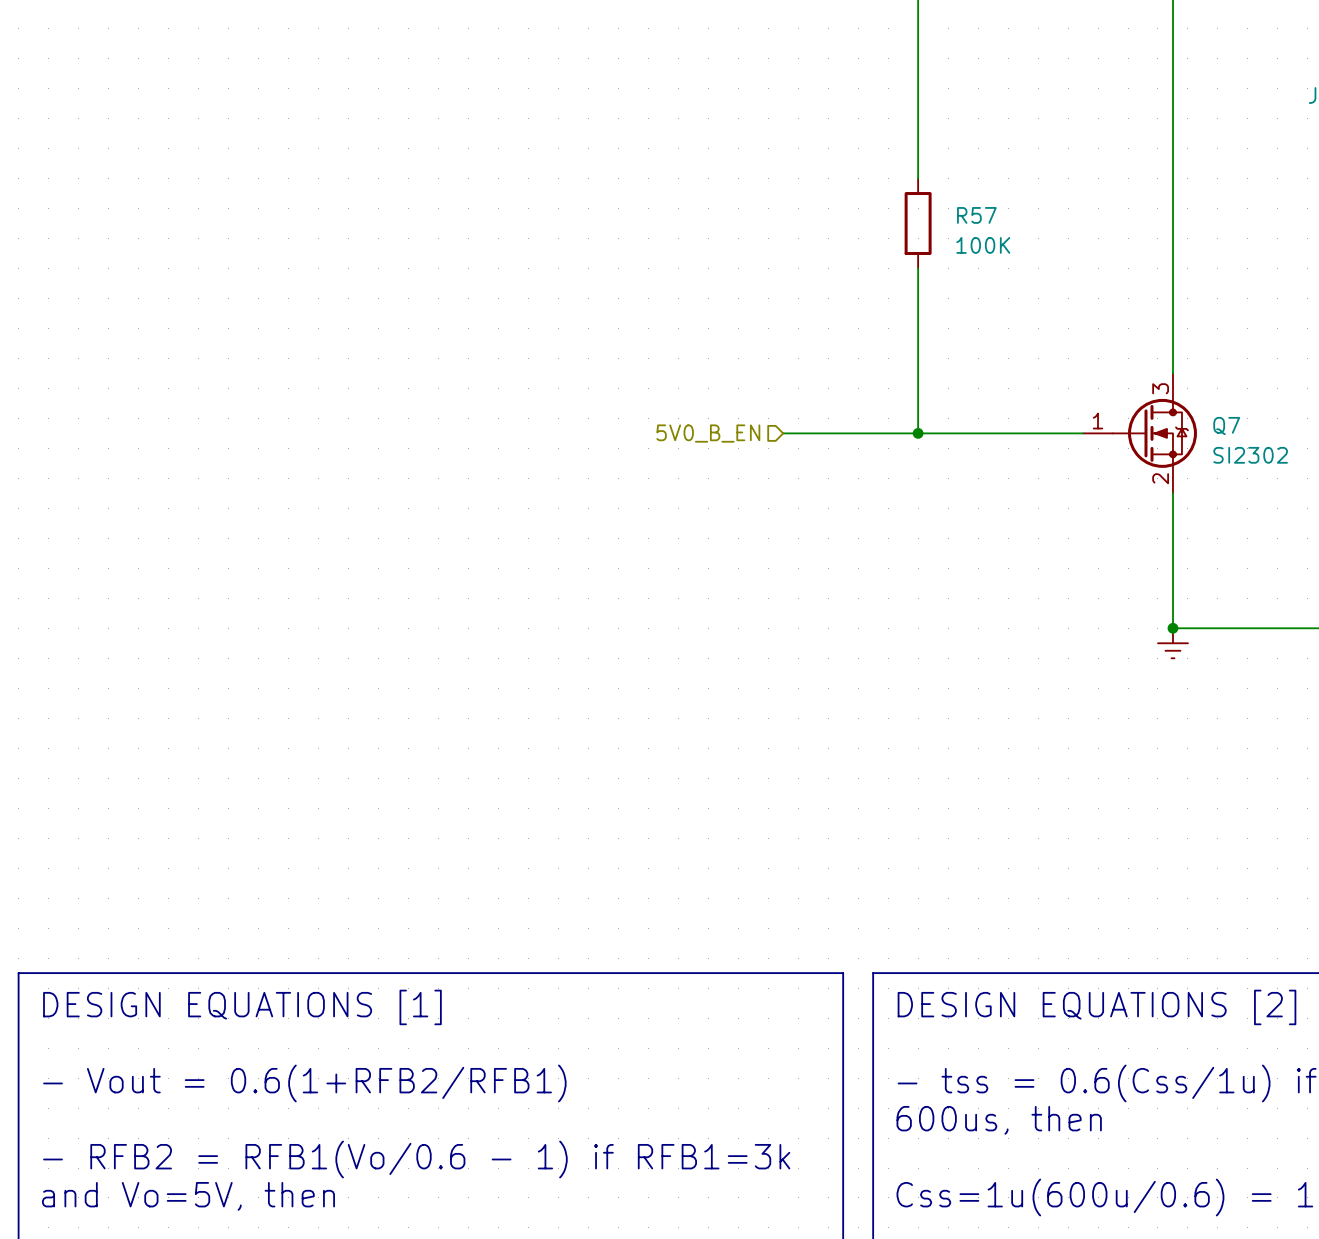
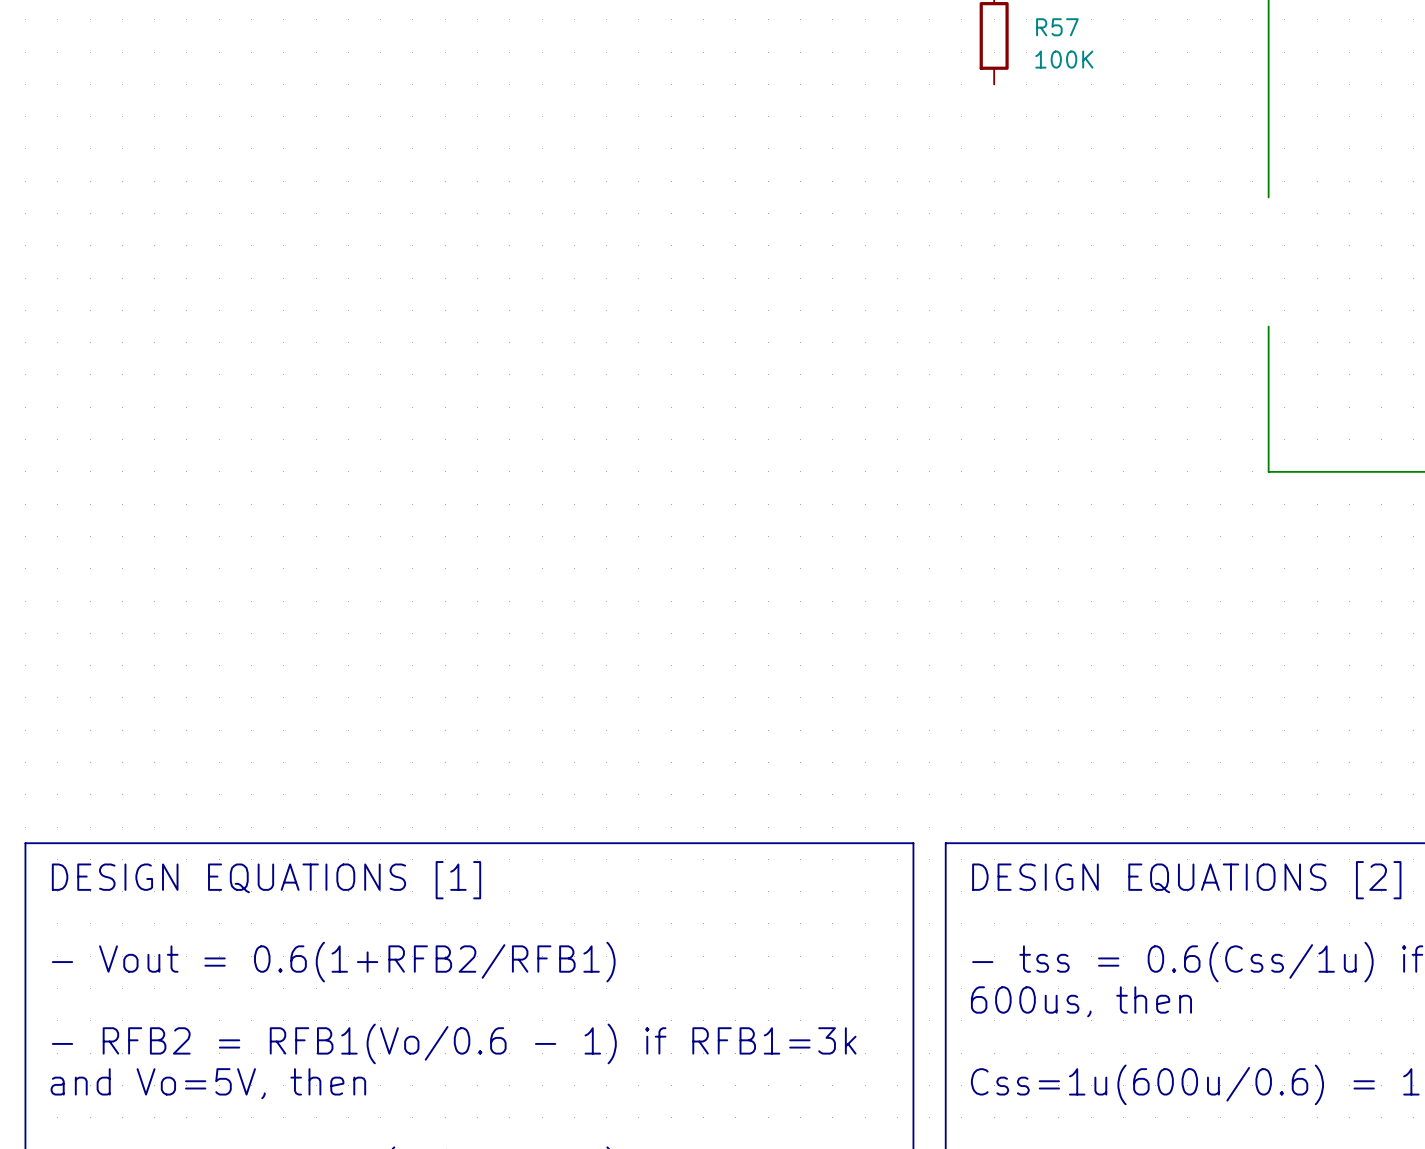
wire: (918, 268) (918, 433) -> none
hierarchical label: 5V0_B_EN (708, 433) -> none
wire: (783, 433) (1083, 433) -> none
junction: (918, 433) -> none
Q7: SI2302 (1140, 433) -> none
junction: (1172, 628) -> none
power symbol: (1172, 643) -> none

